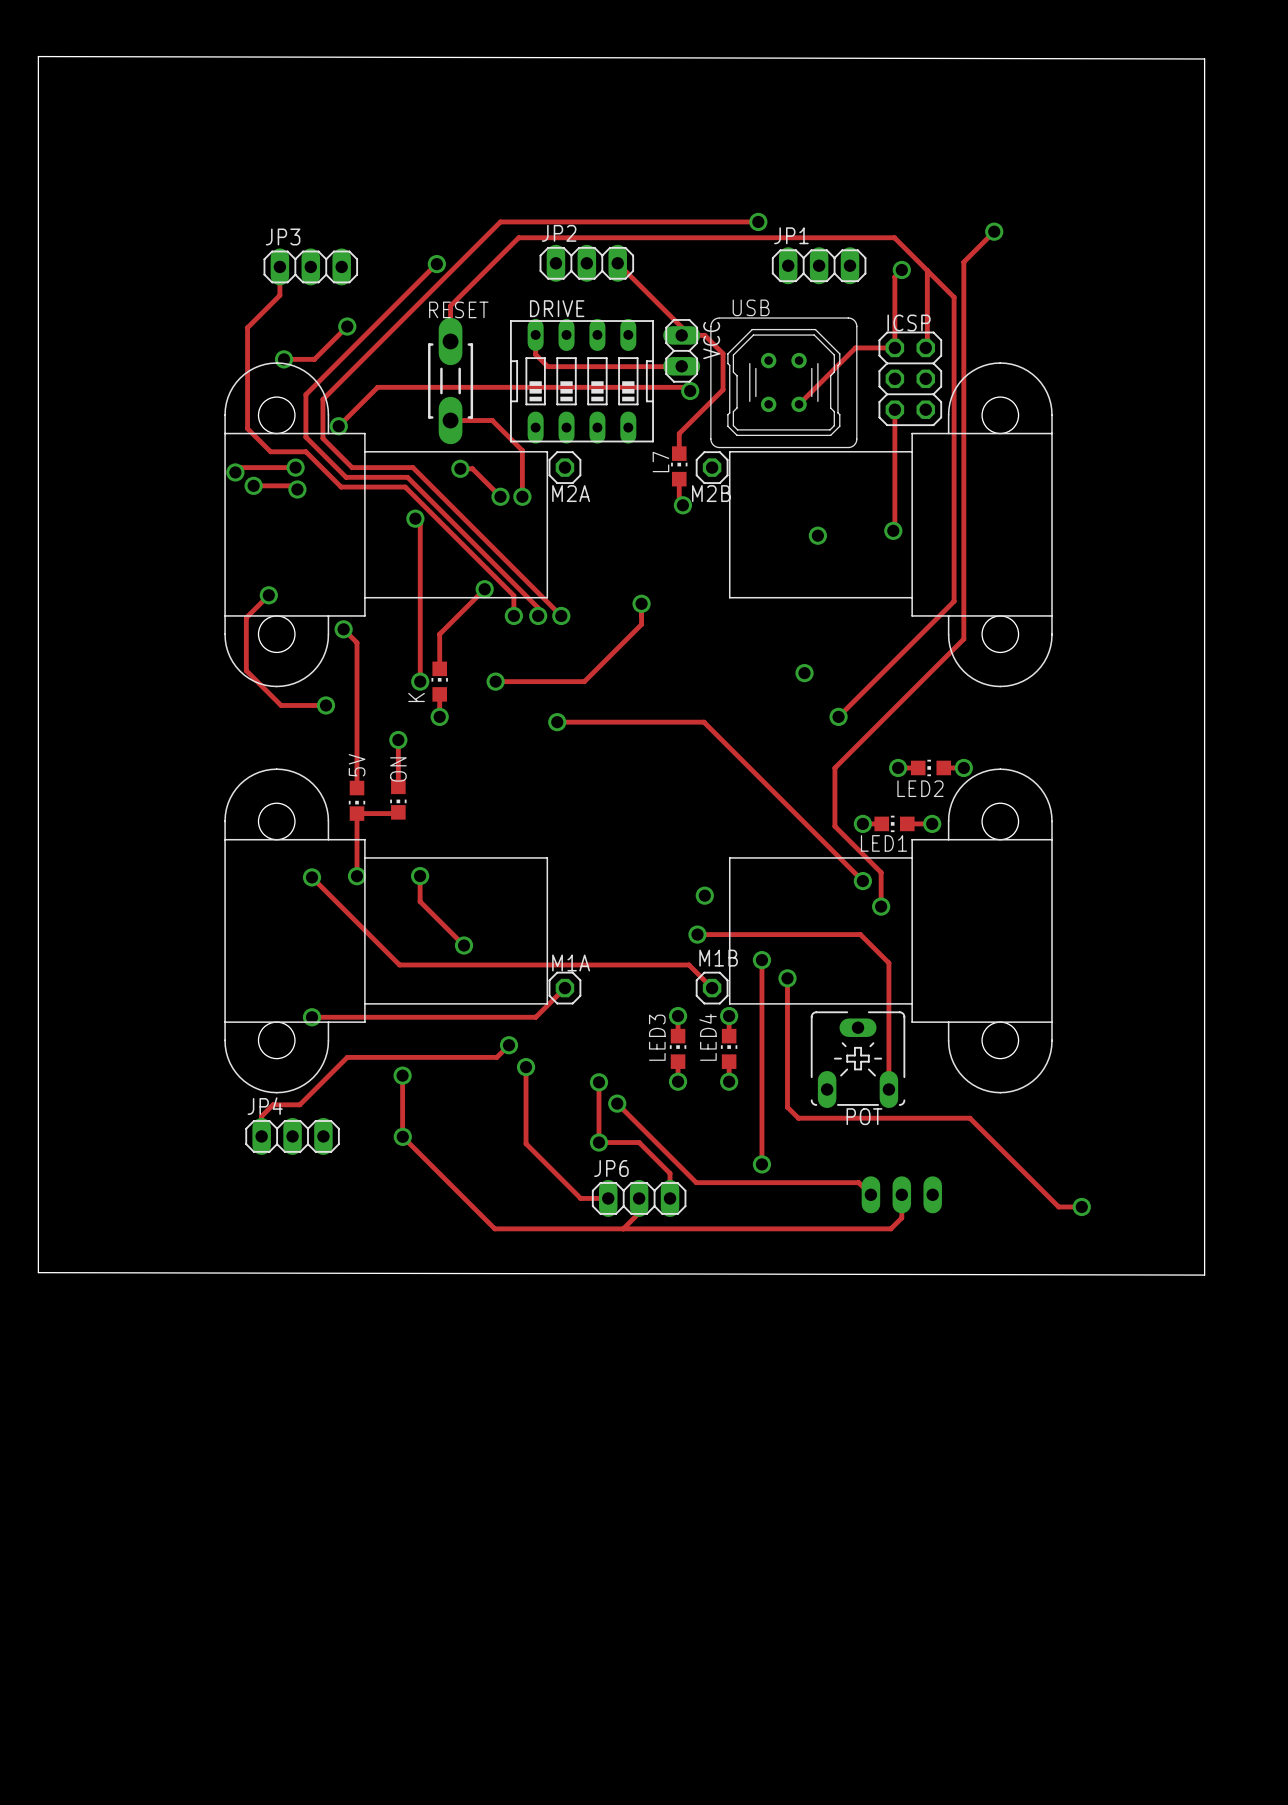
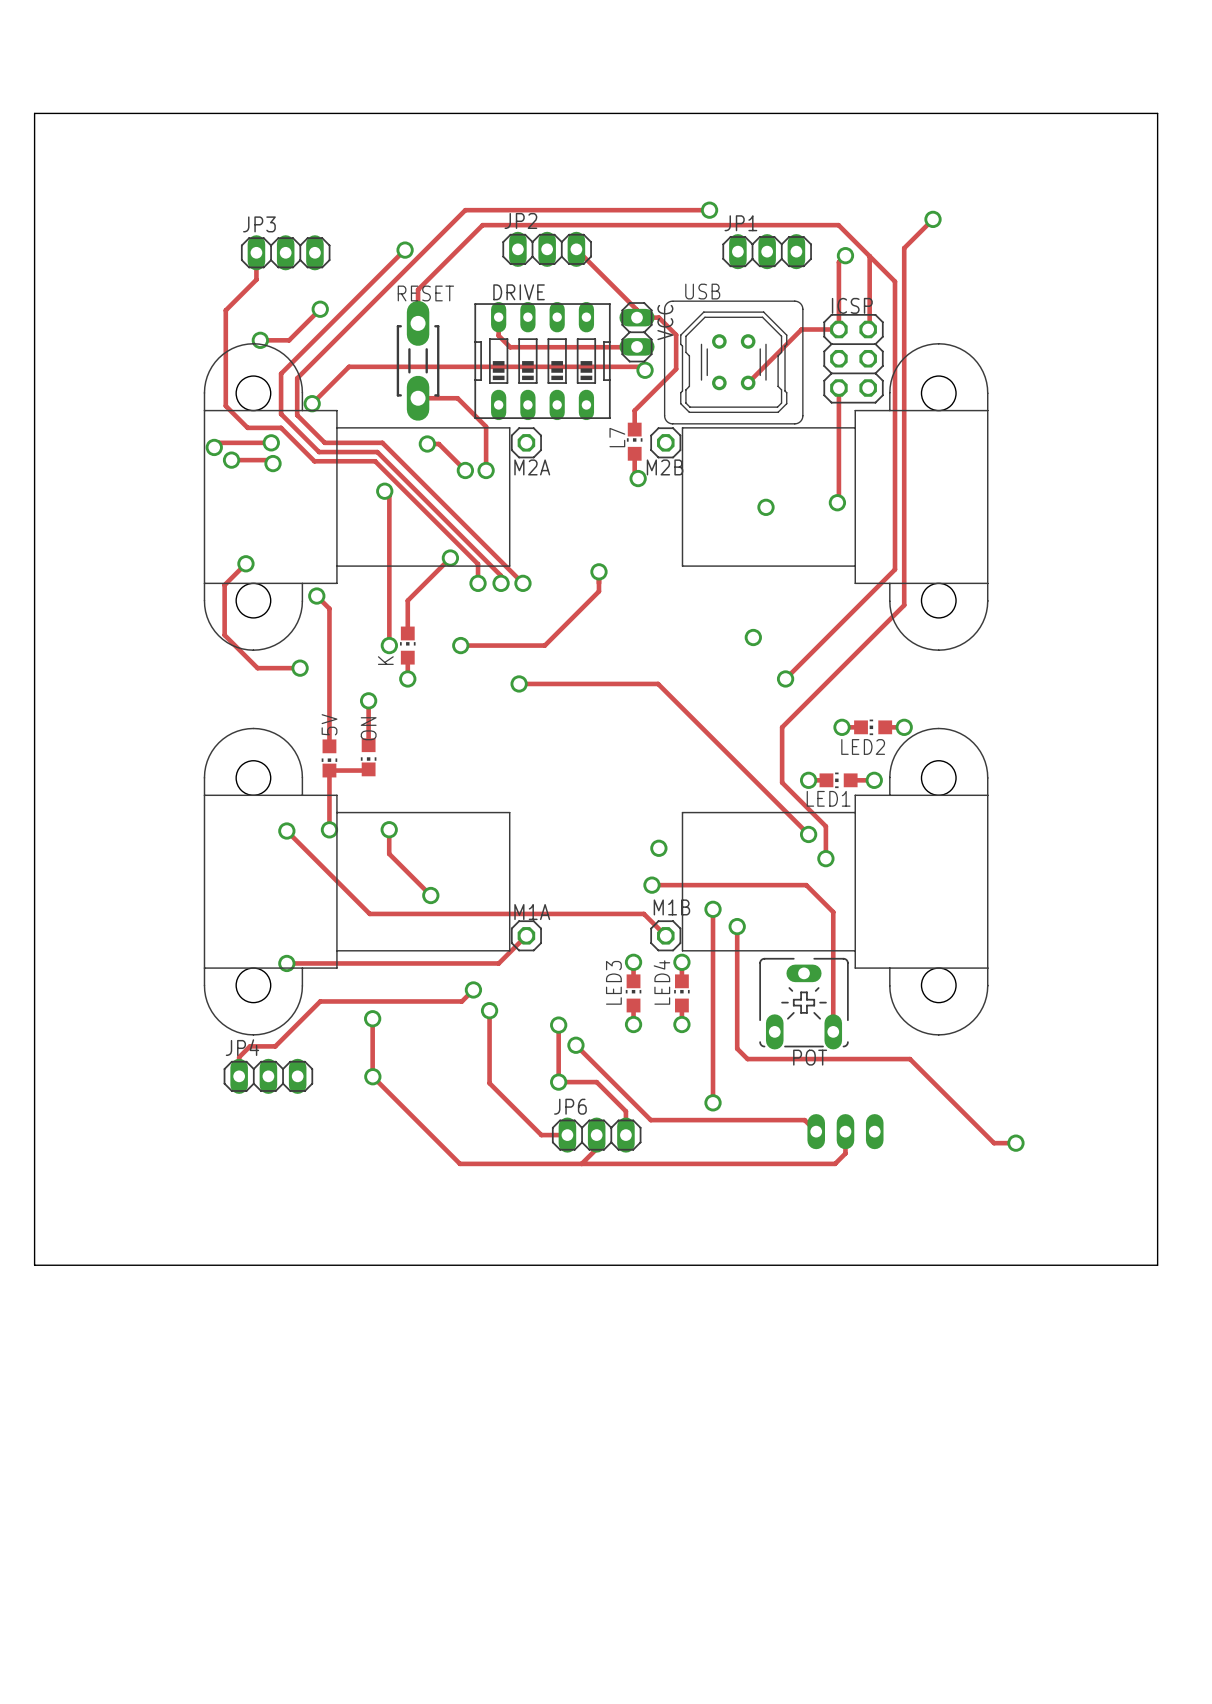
board edge: (38, 56) (38, 1272) (1204, 1275) (1204, 58) (38, 56) -> (34, 113) (34, 1265) (1157, 1265) (1157, 113) (34, 113)

